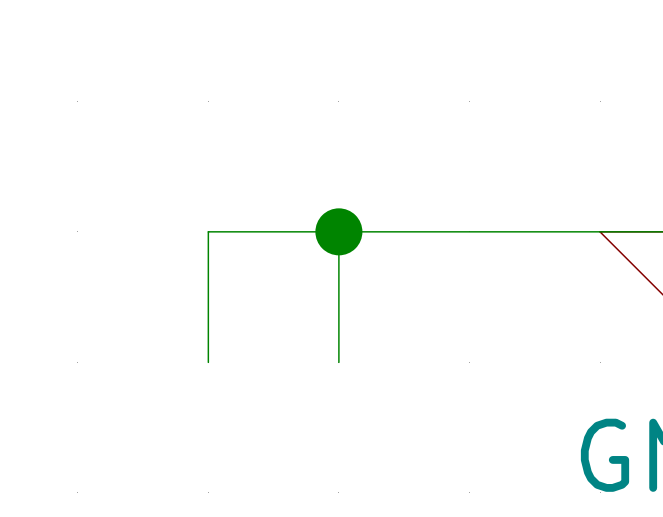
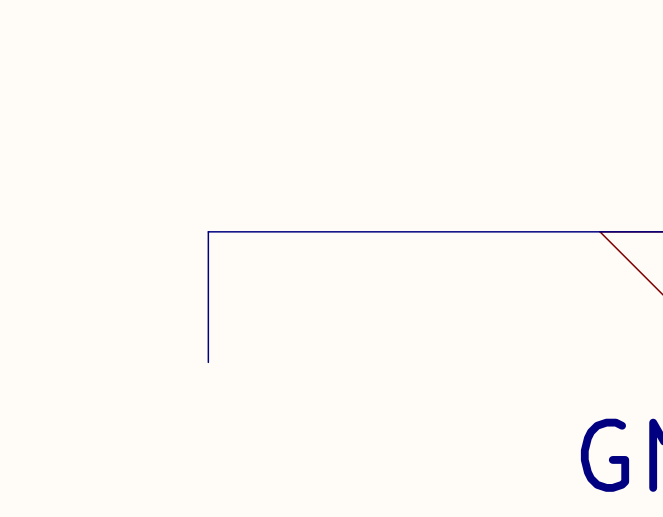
wire: (338, 231) (338, 362) -> none
junction: (338, 231) -> none

